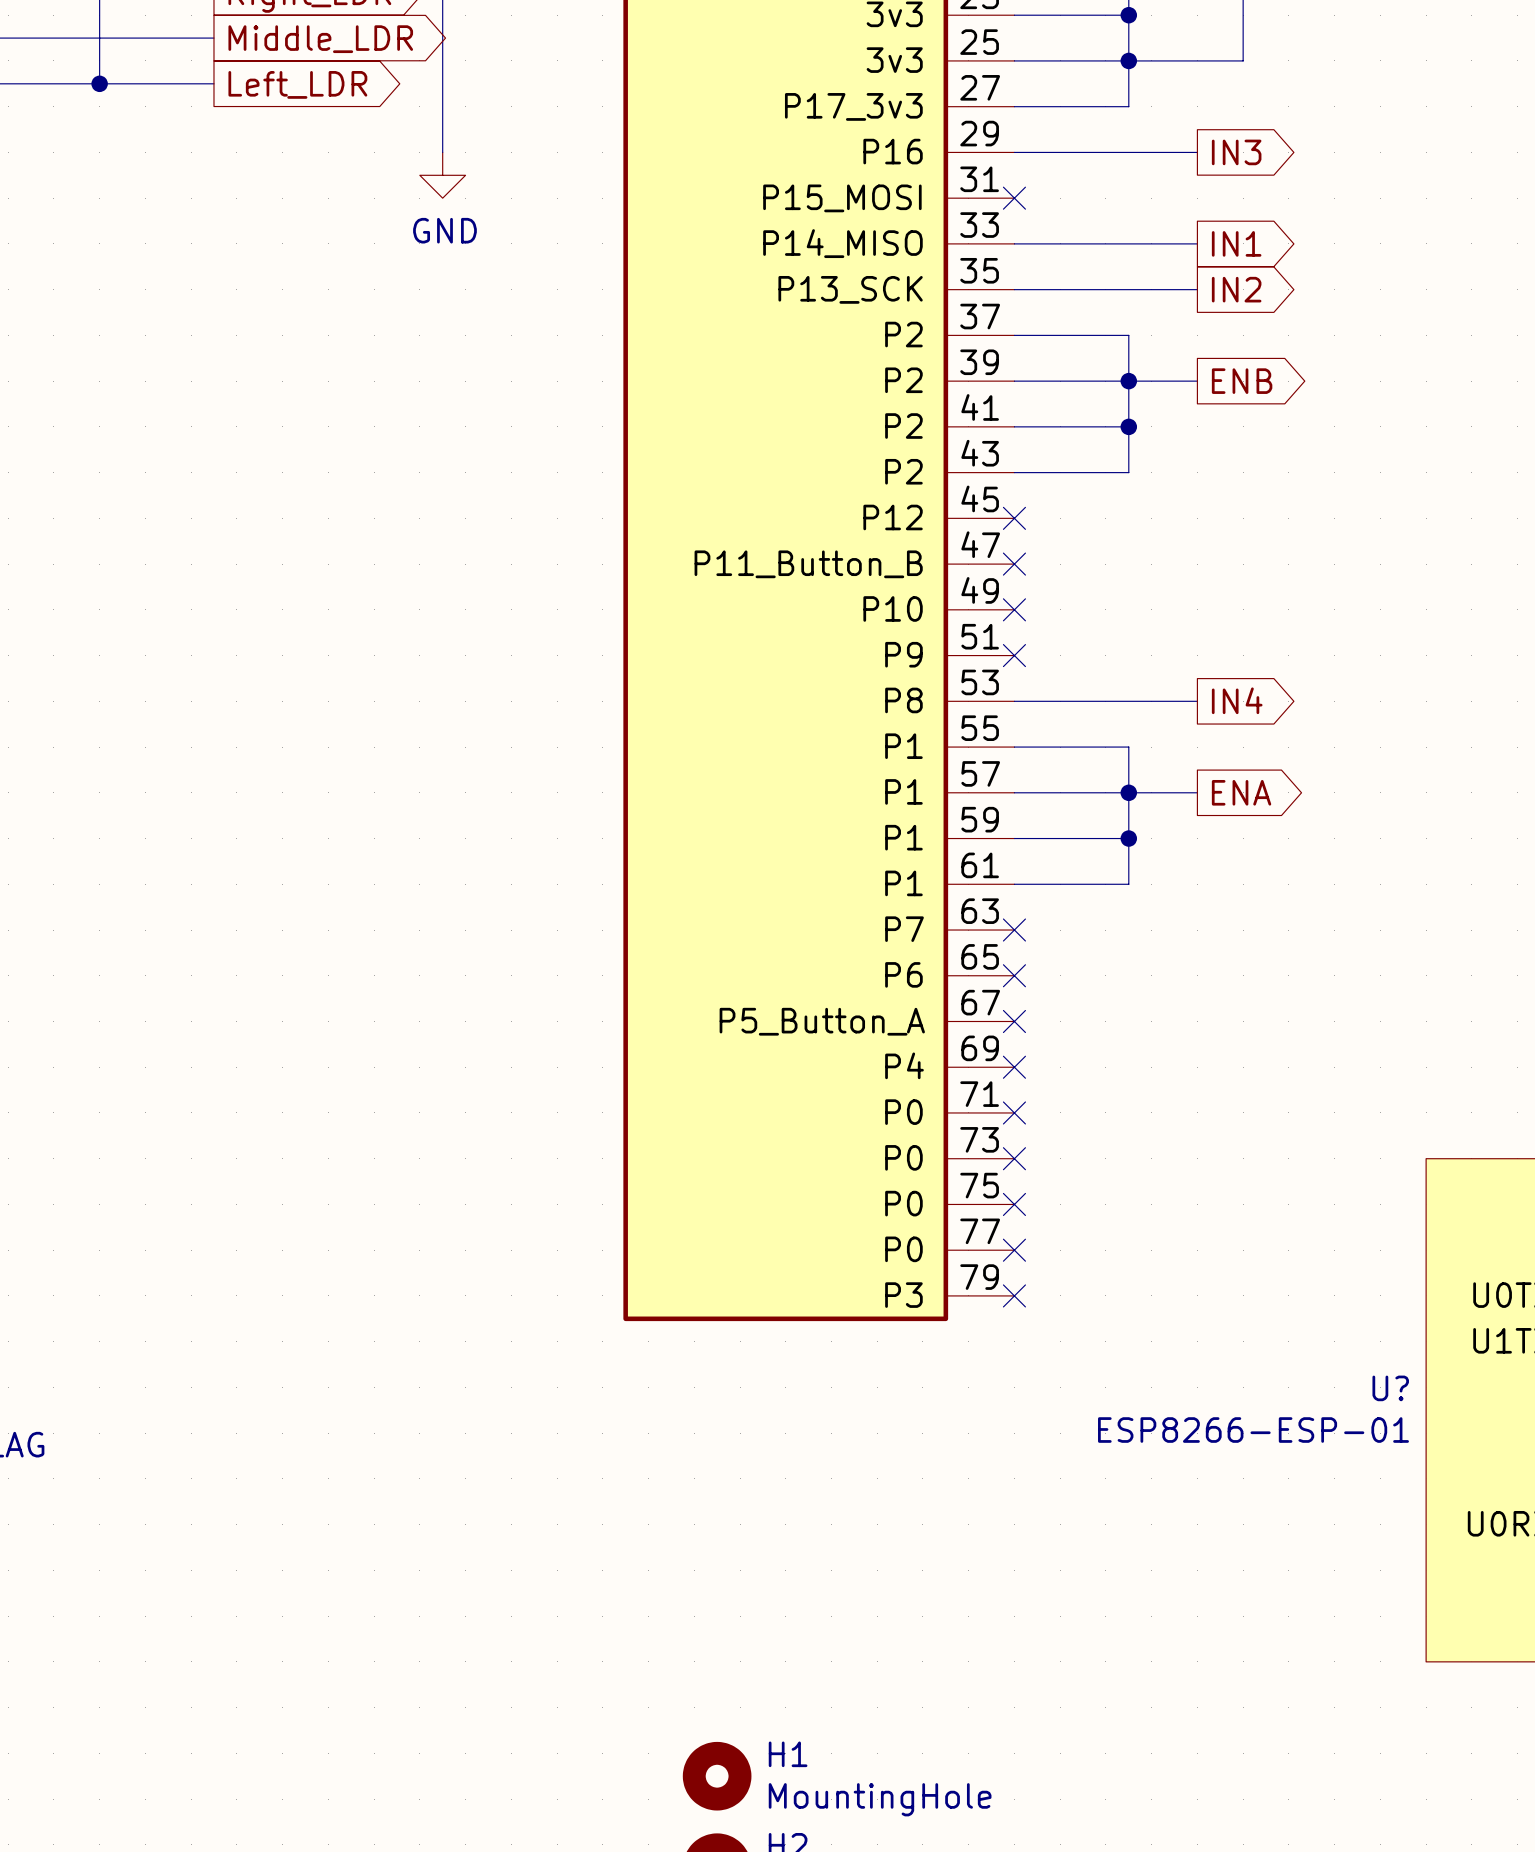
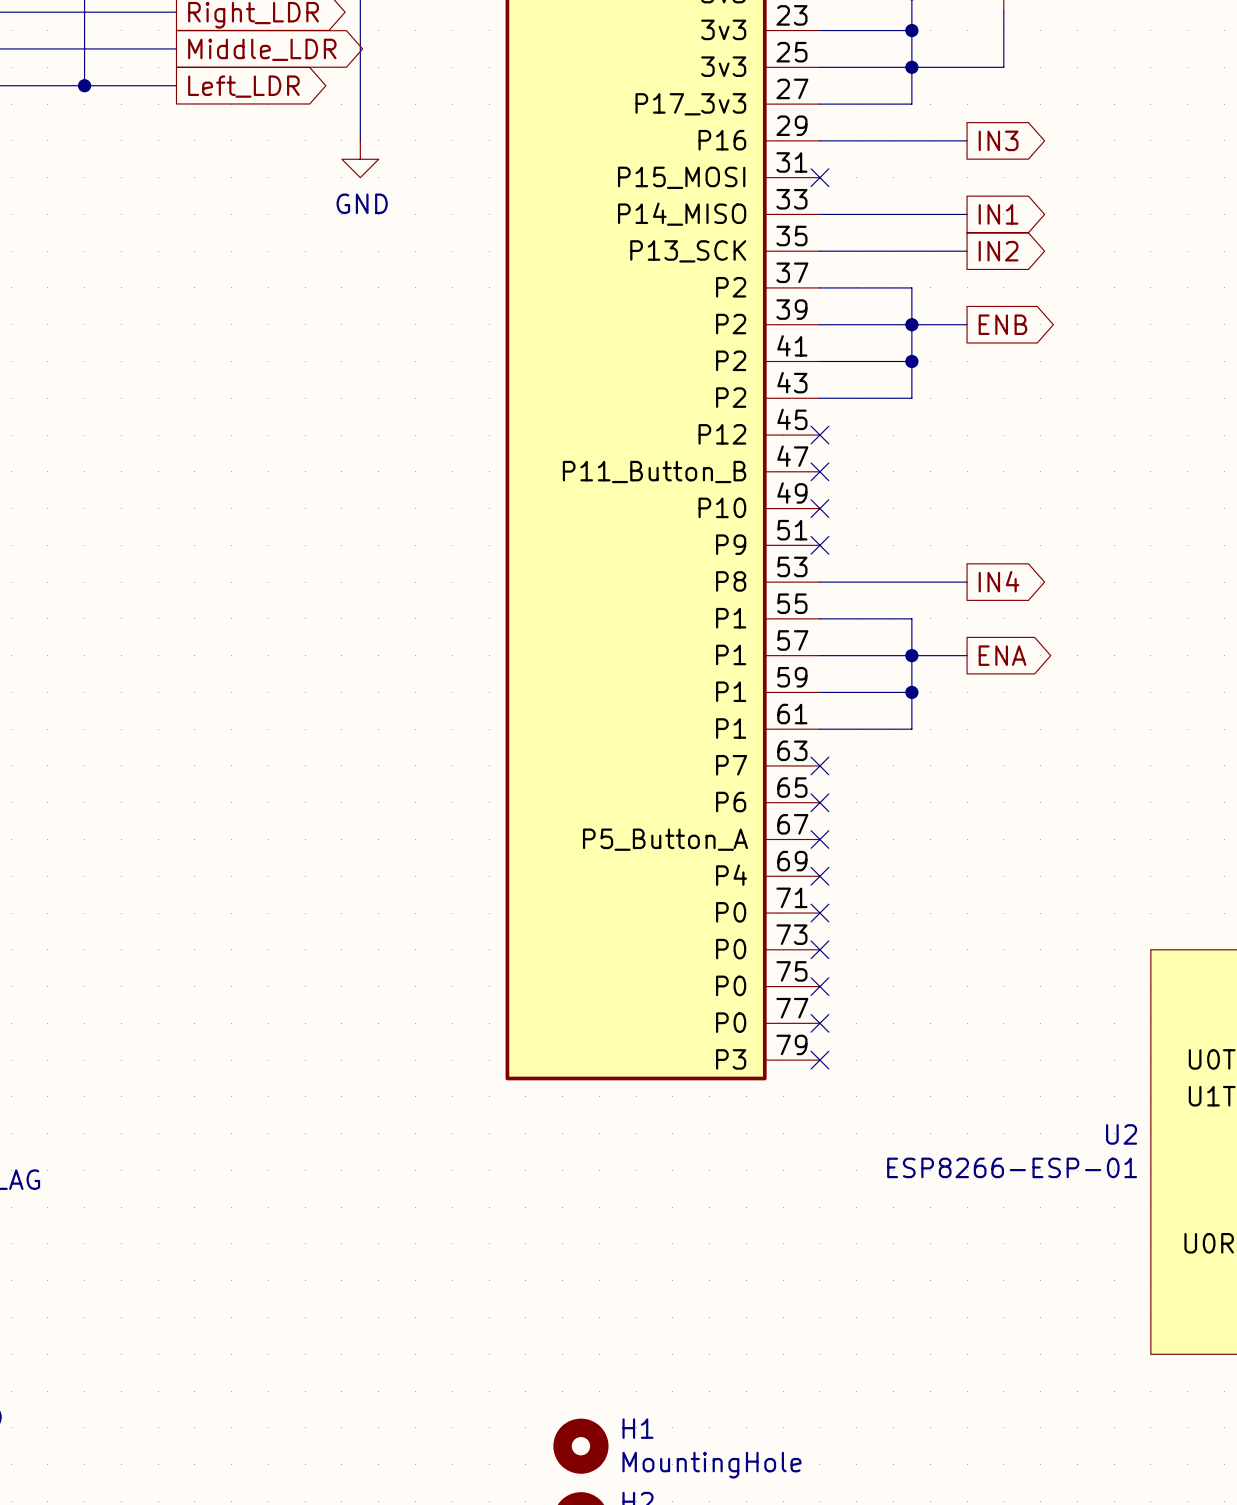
U? name: U? (1390, 1388) -> U2 (1121, 1134)

